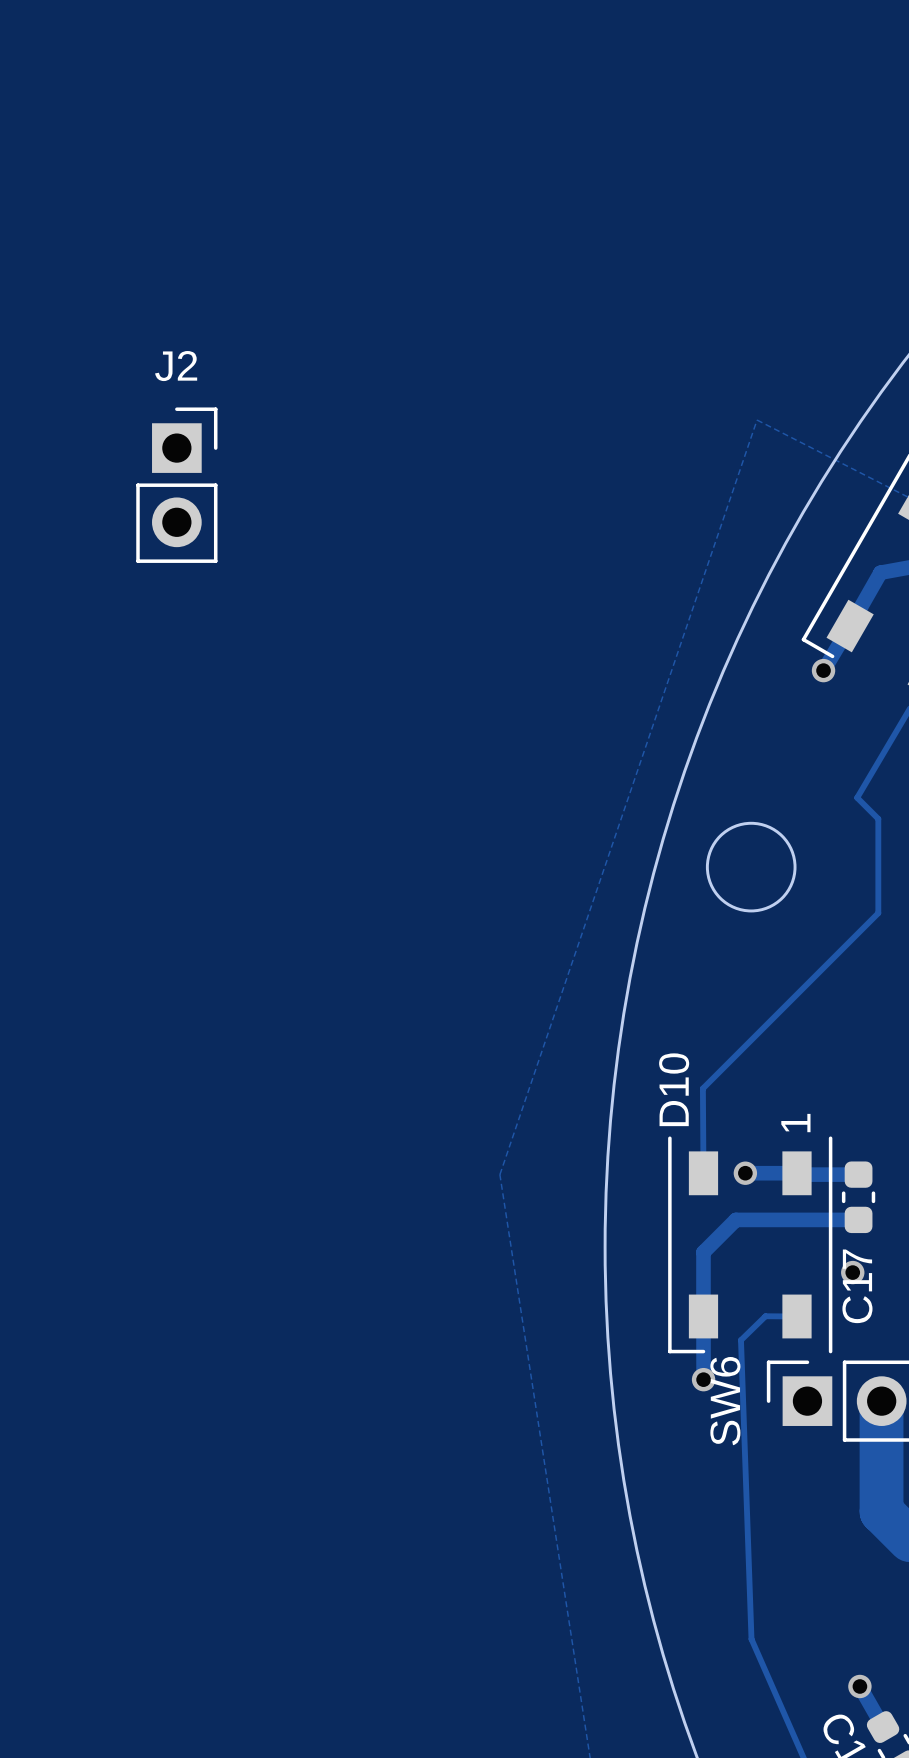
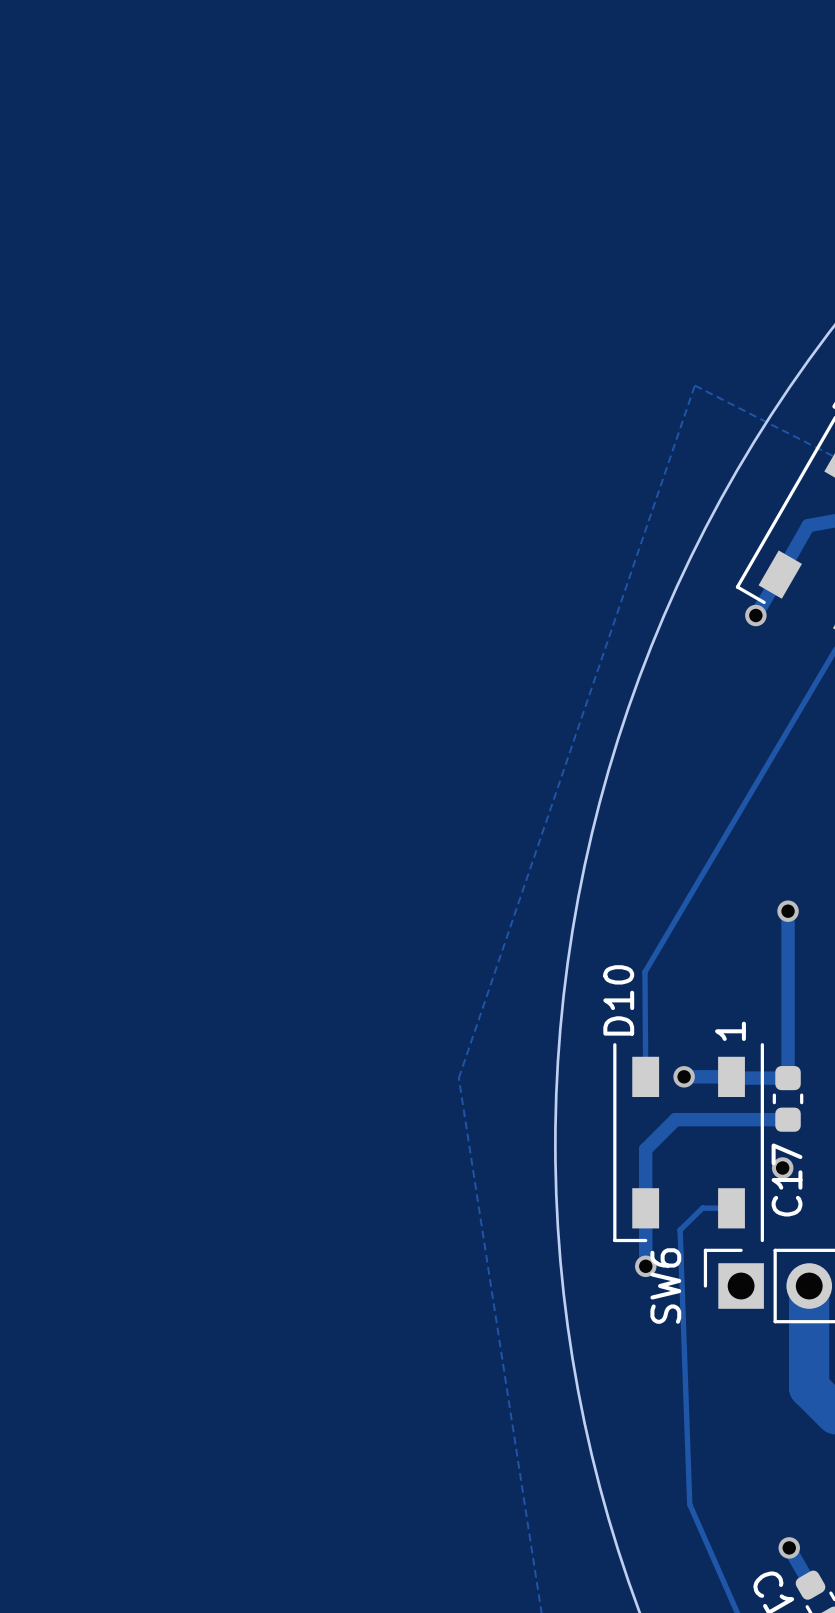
J2: (176, 485) -> none
track: (857, 797) (878, 818) (878, 913) (702, 1088) -> (786, 732) (644, 972) (645, 999)
round board edge: [705, 821, 797, 913] -> none
track: none -> (788, 911) (788, 1078)
via: none -> (788, 911)

